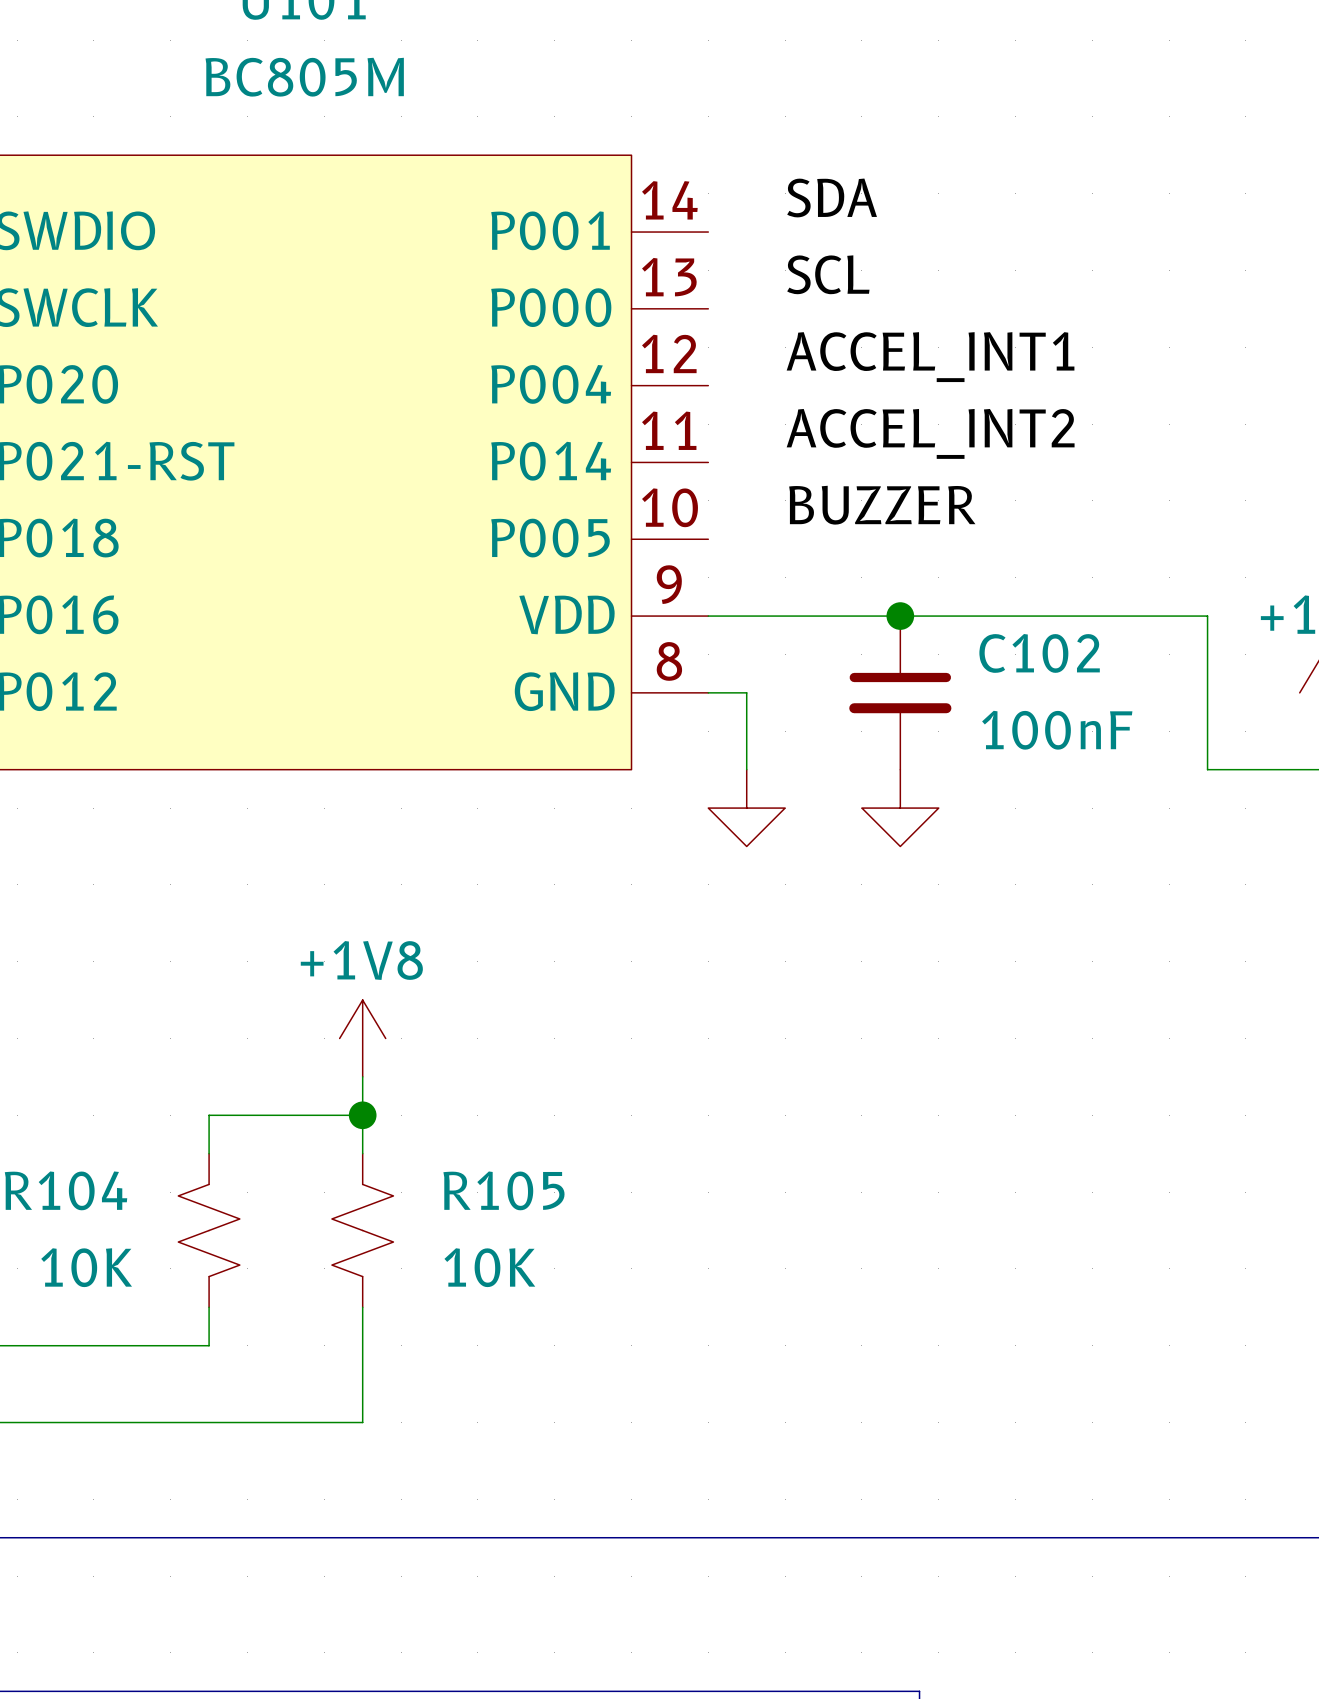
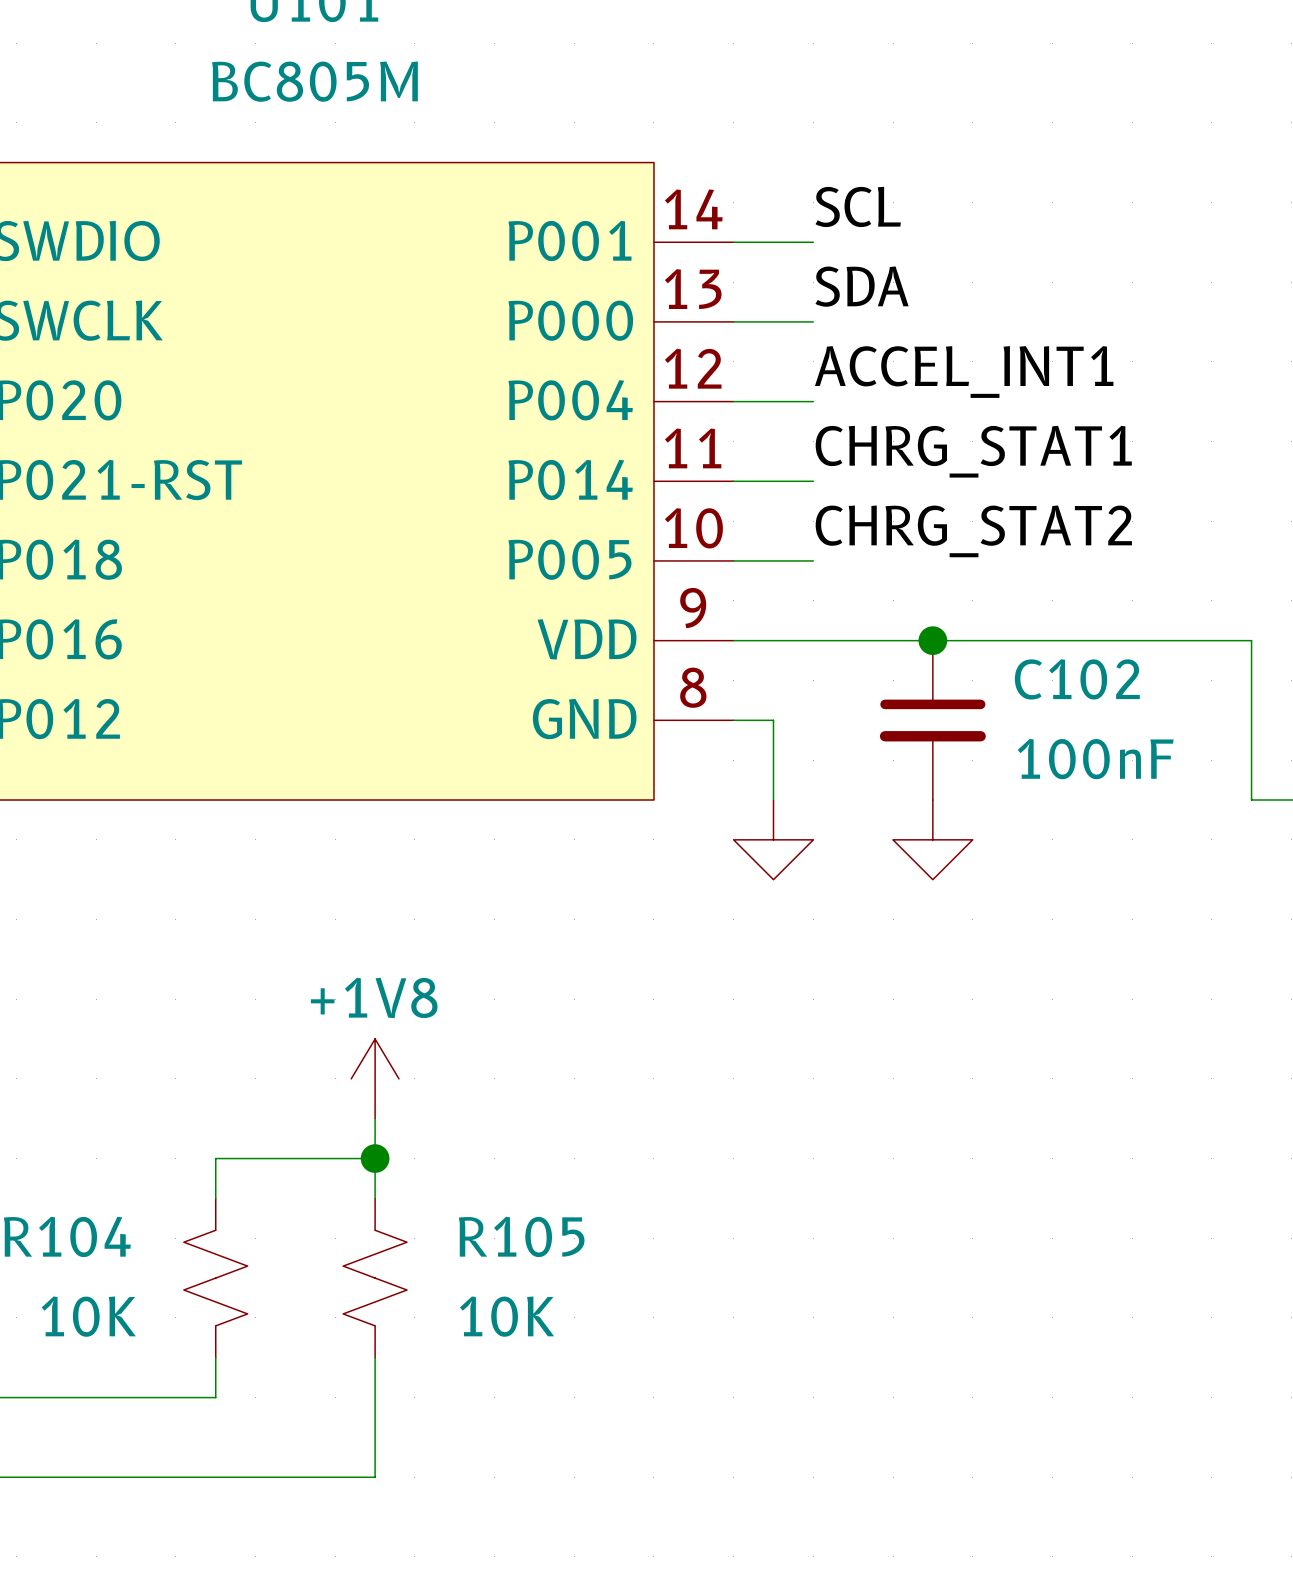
label: SDA (832, 197) -> SCL (858, 206)
wire: none -> (733, 242) (813, 242)
label: SCL (828, 274) -> SDA (862, 286)
wire: none -> (733, 321) (813, 321)
wire: none -> (733, 401) (813, 401)
label: ACCEL_INT2 (930, 433) -> CHRG_STAT1 (973, 451)
wire: none -> (733, 481) (813, 481)
label: BUZZER (882, 505) -> CHRG_STAT2 (973, 531)
wire: none -> (733, 560) (813, 560)

